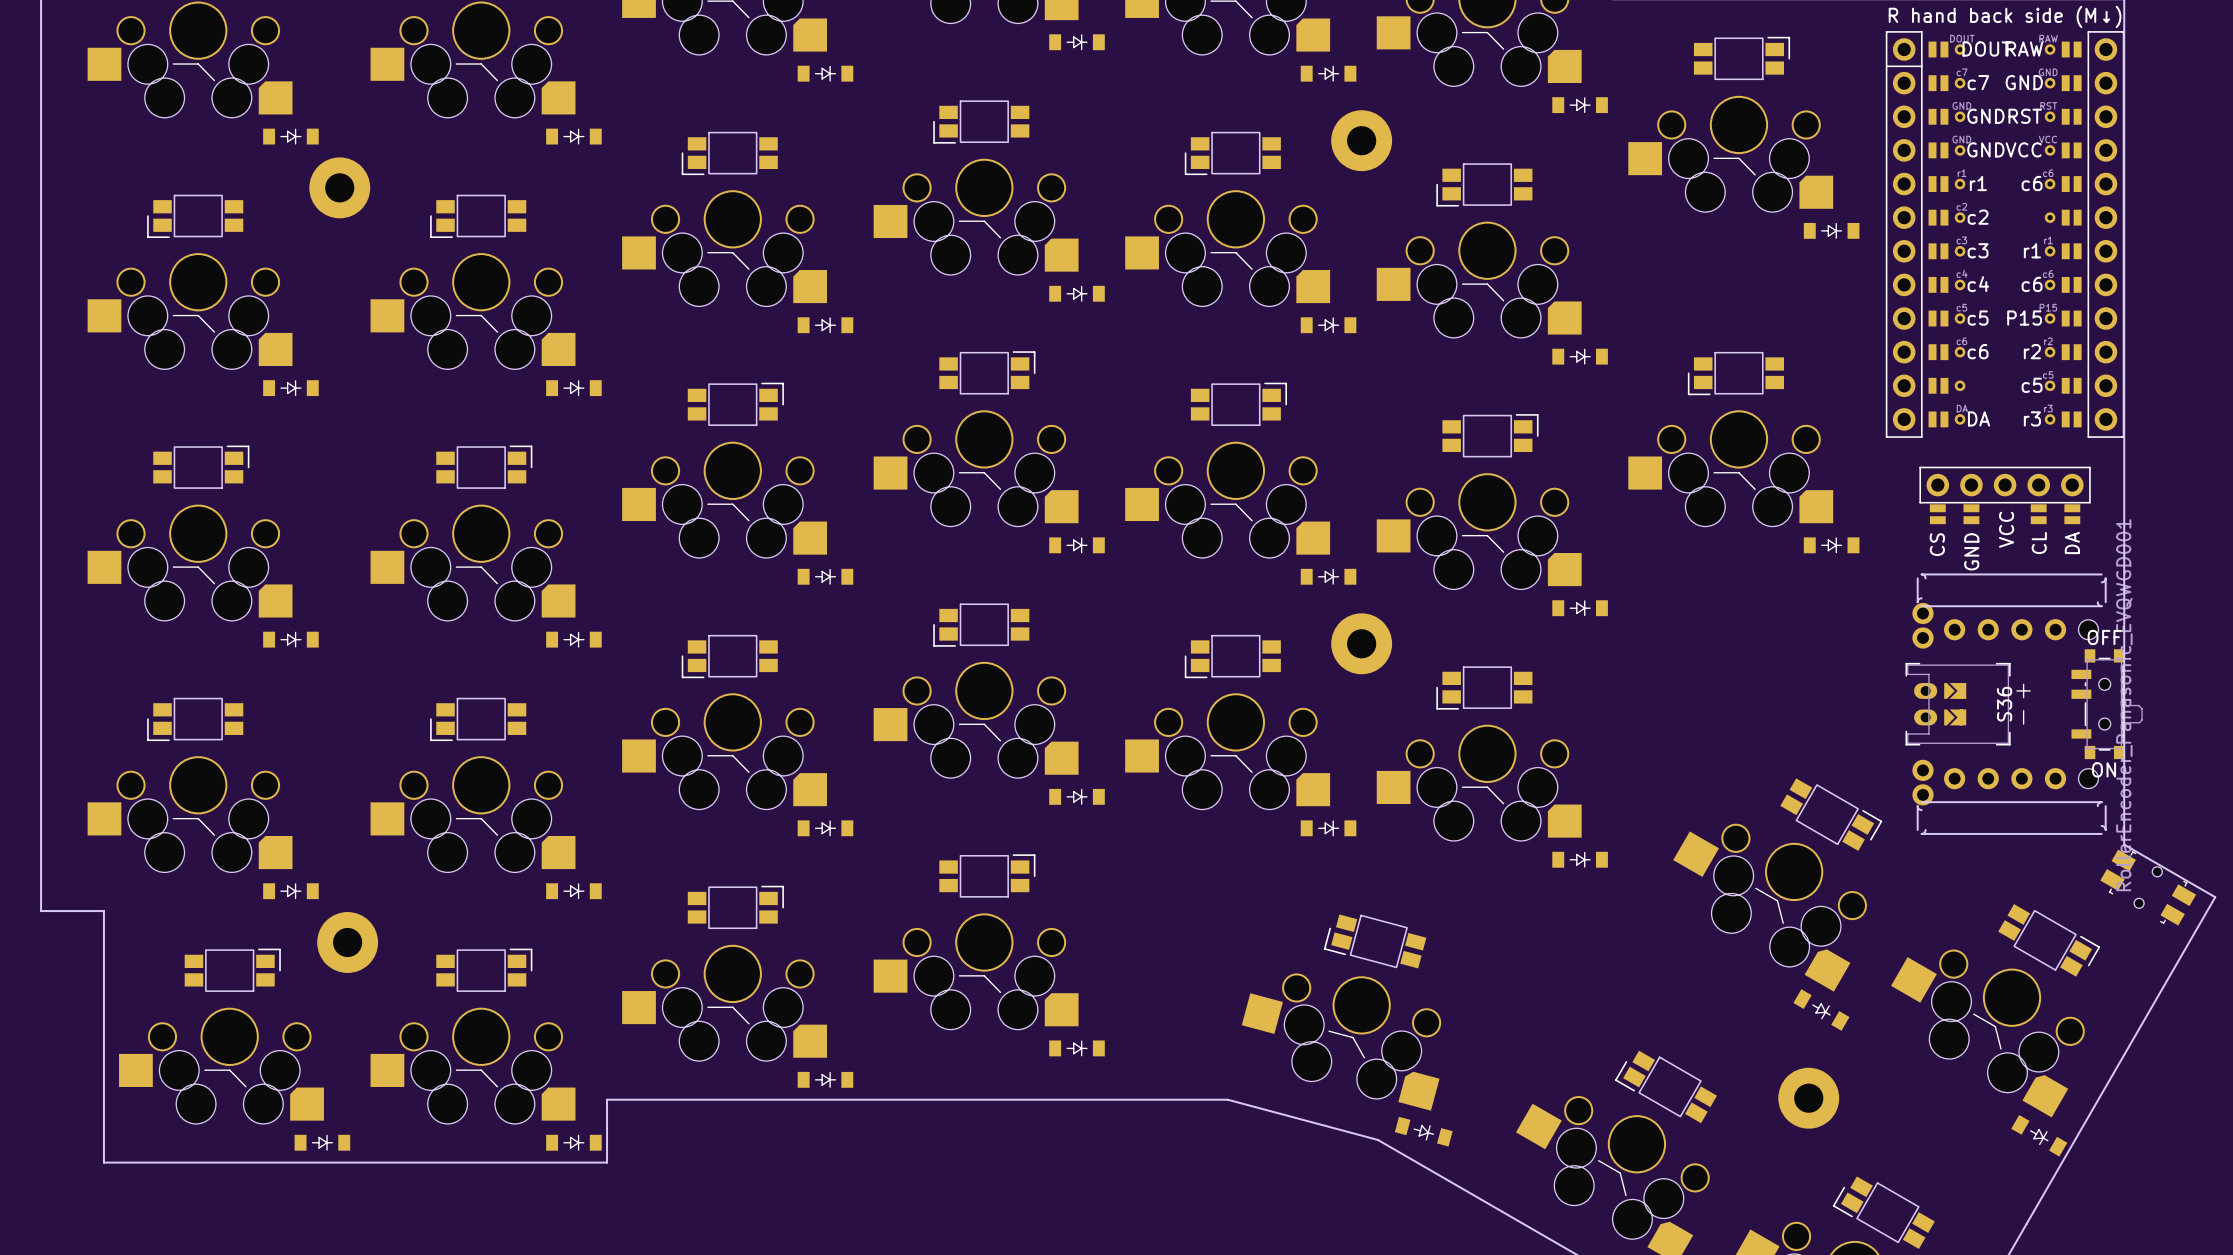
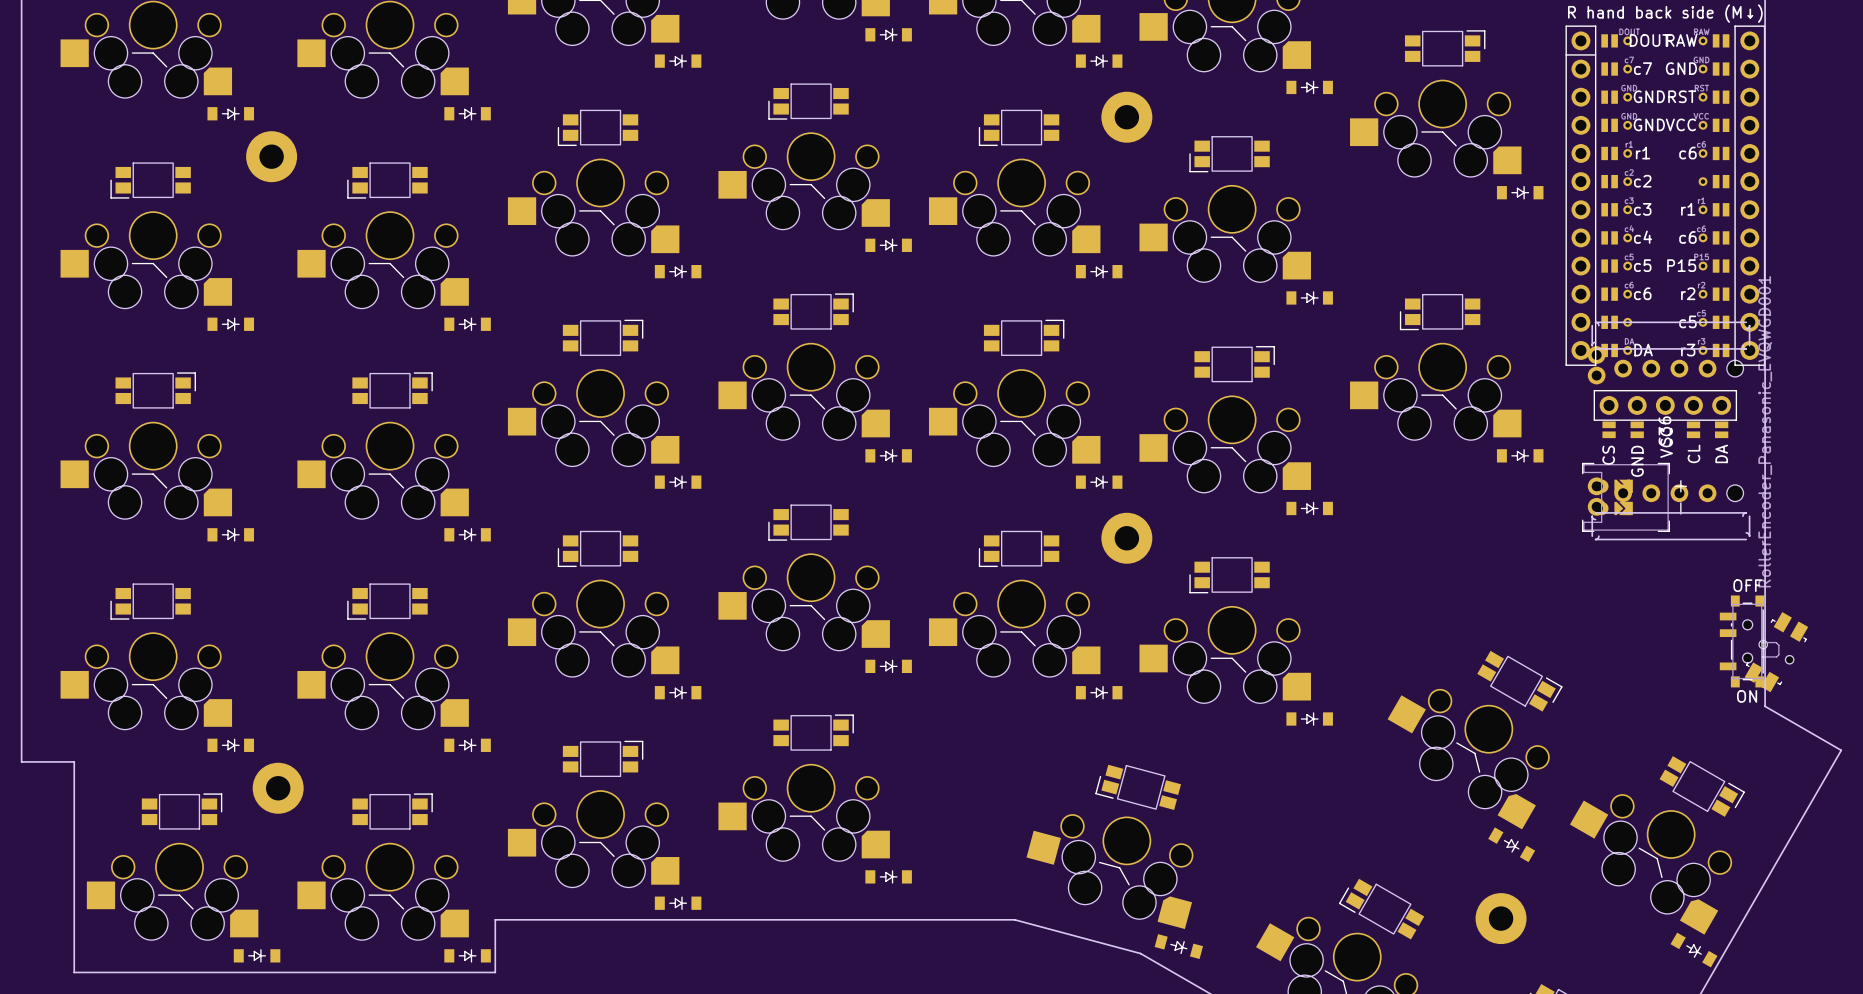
part position: (1968, 704) -> (1634, 497)
S36 position: (2009, 704) -> (1669, 430)
part position: (2107, 704) -> (1749, 641)
part rotation: 0° (2148, 887) -> 90° clockwise (1776, 652)
part position: (2148, 887) -> (1776, 652)

